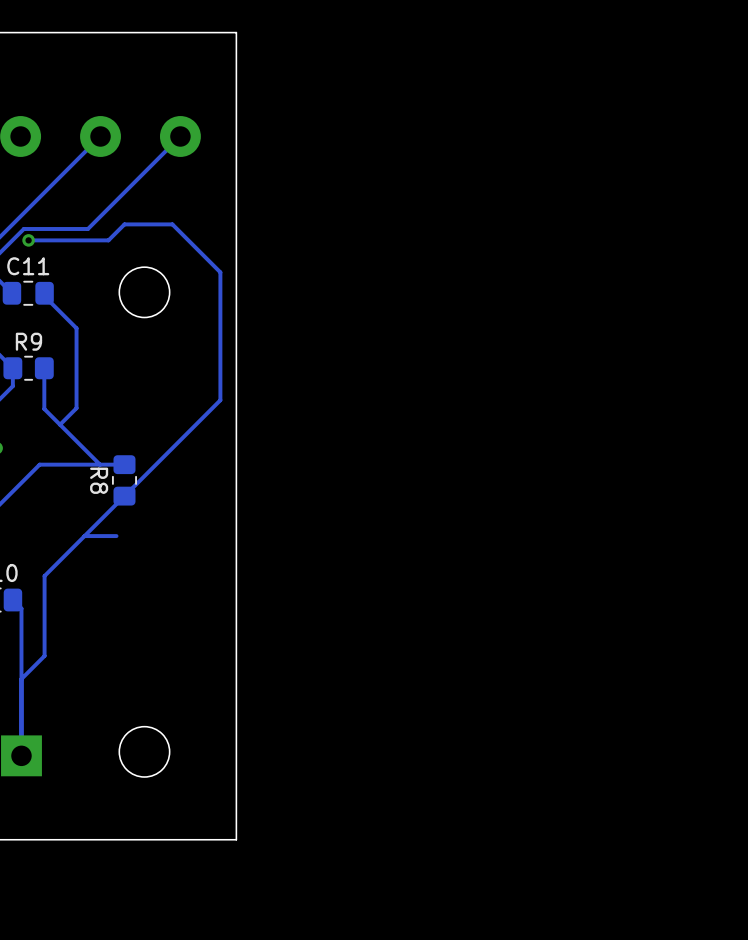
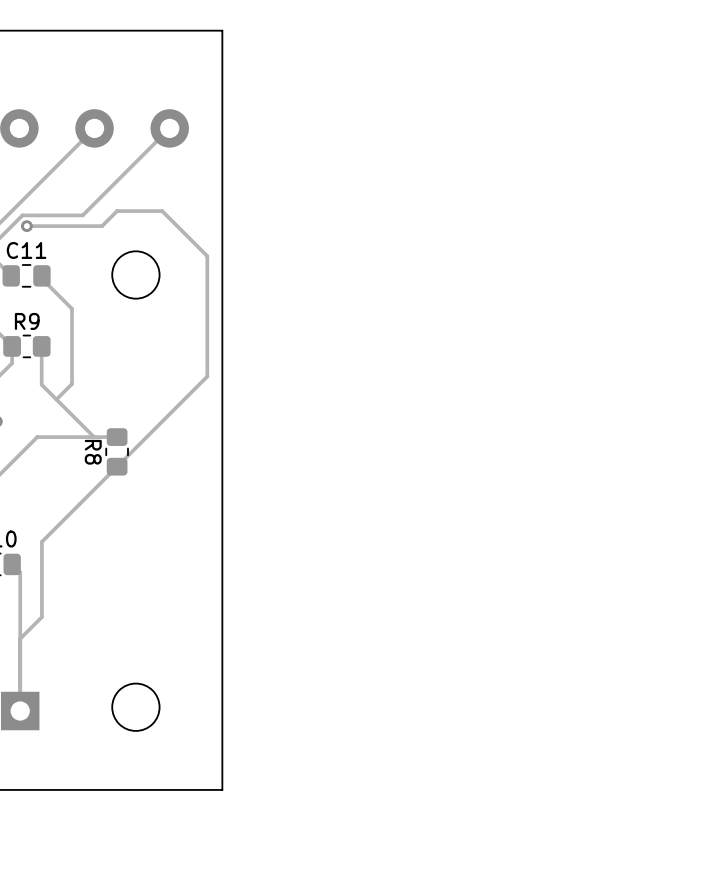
track: (116, 536) (84, 536) -> none

